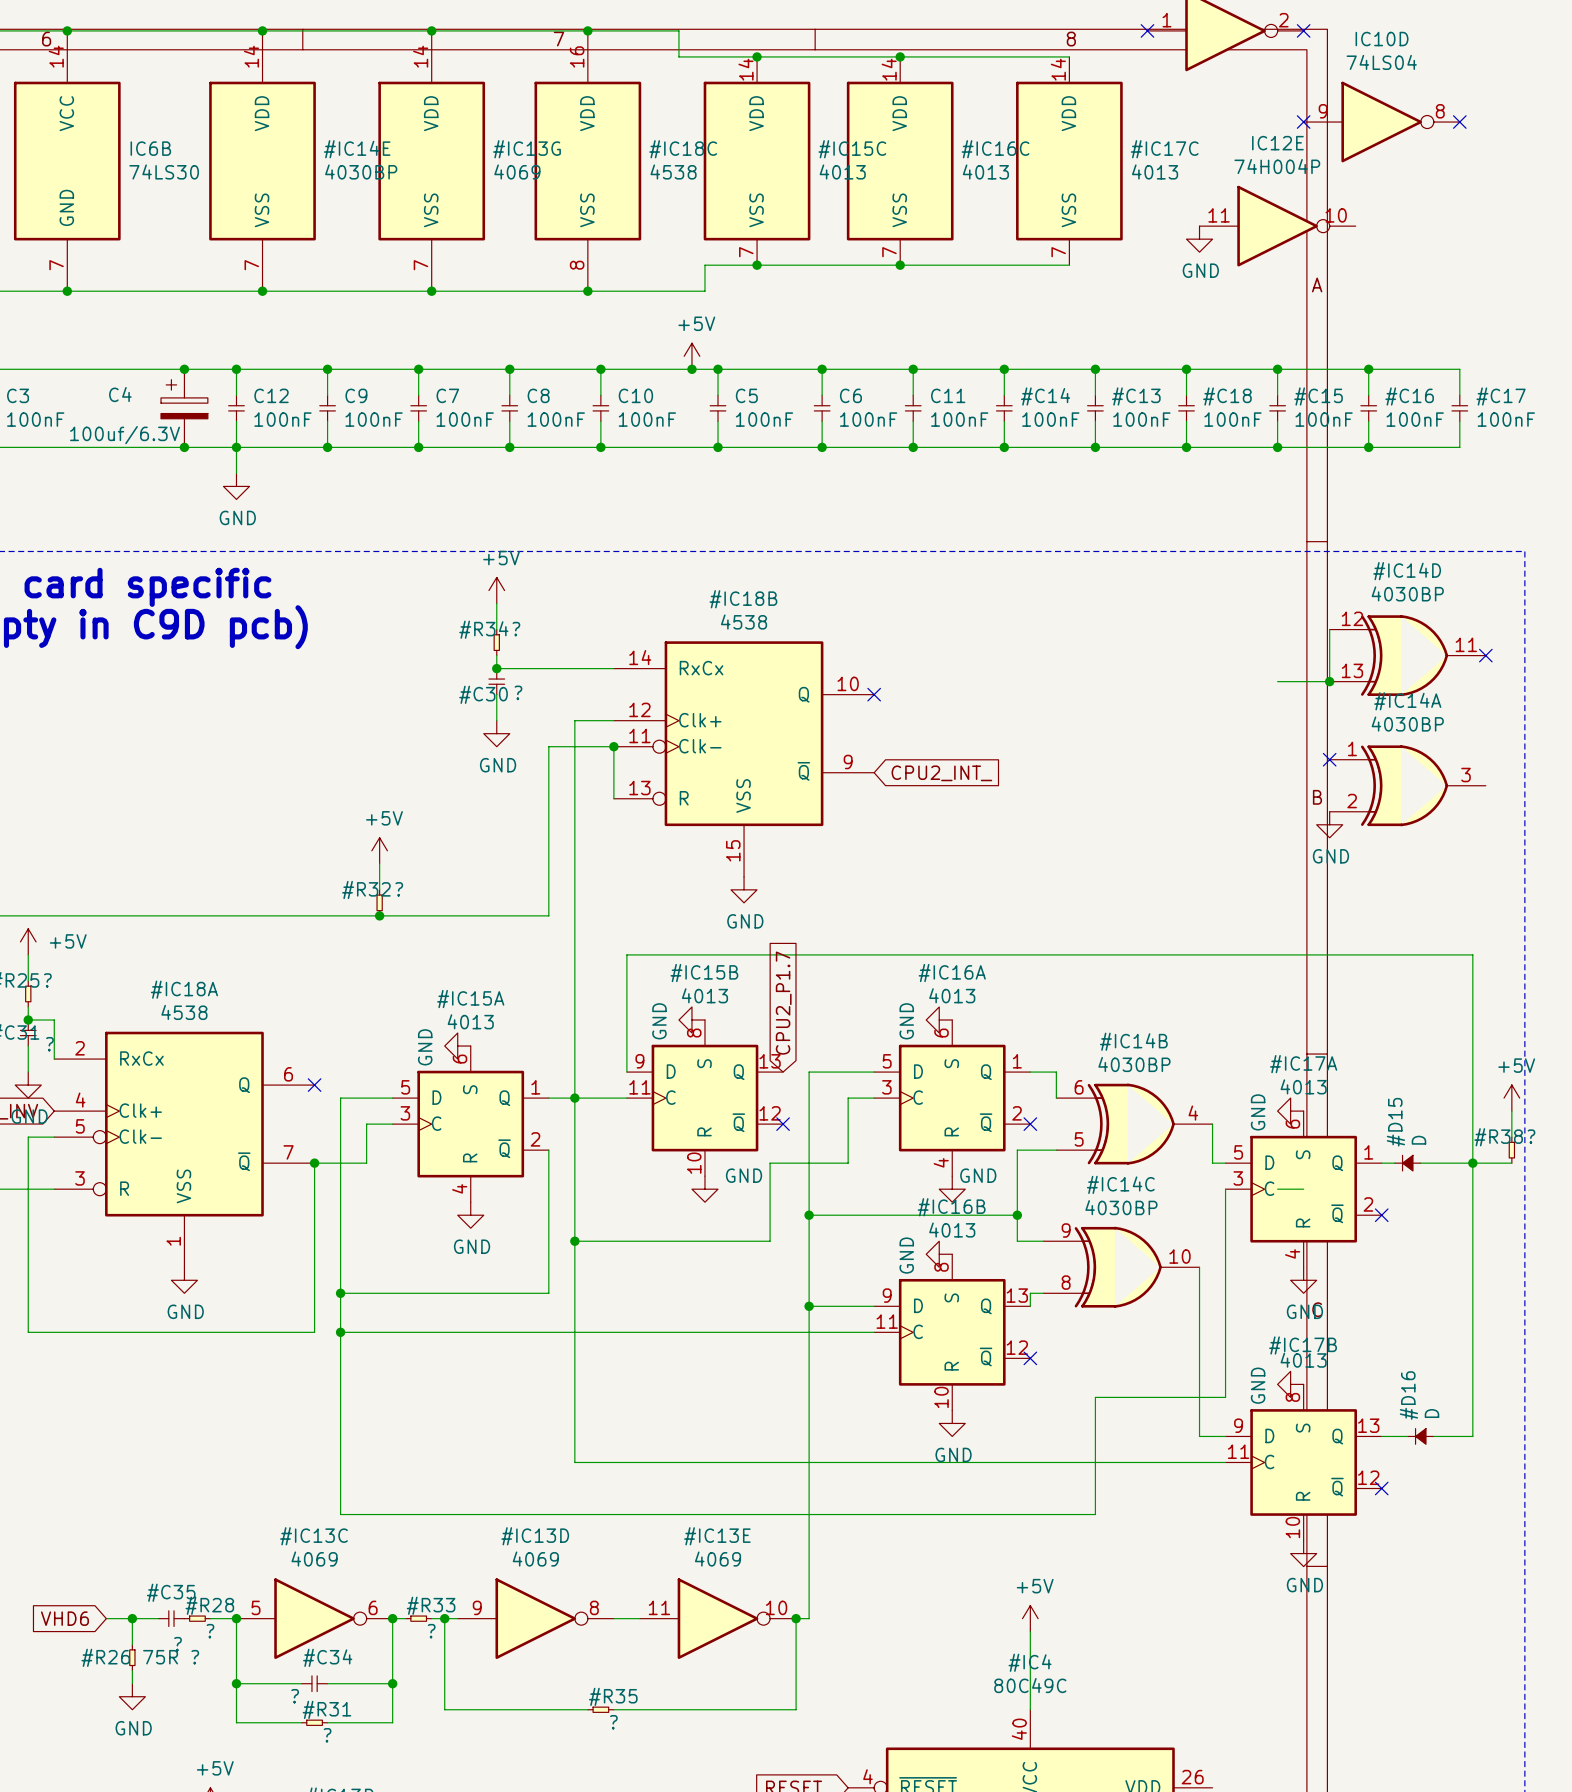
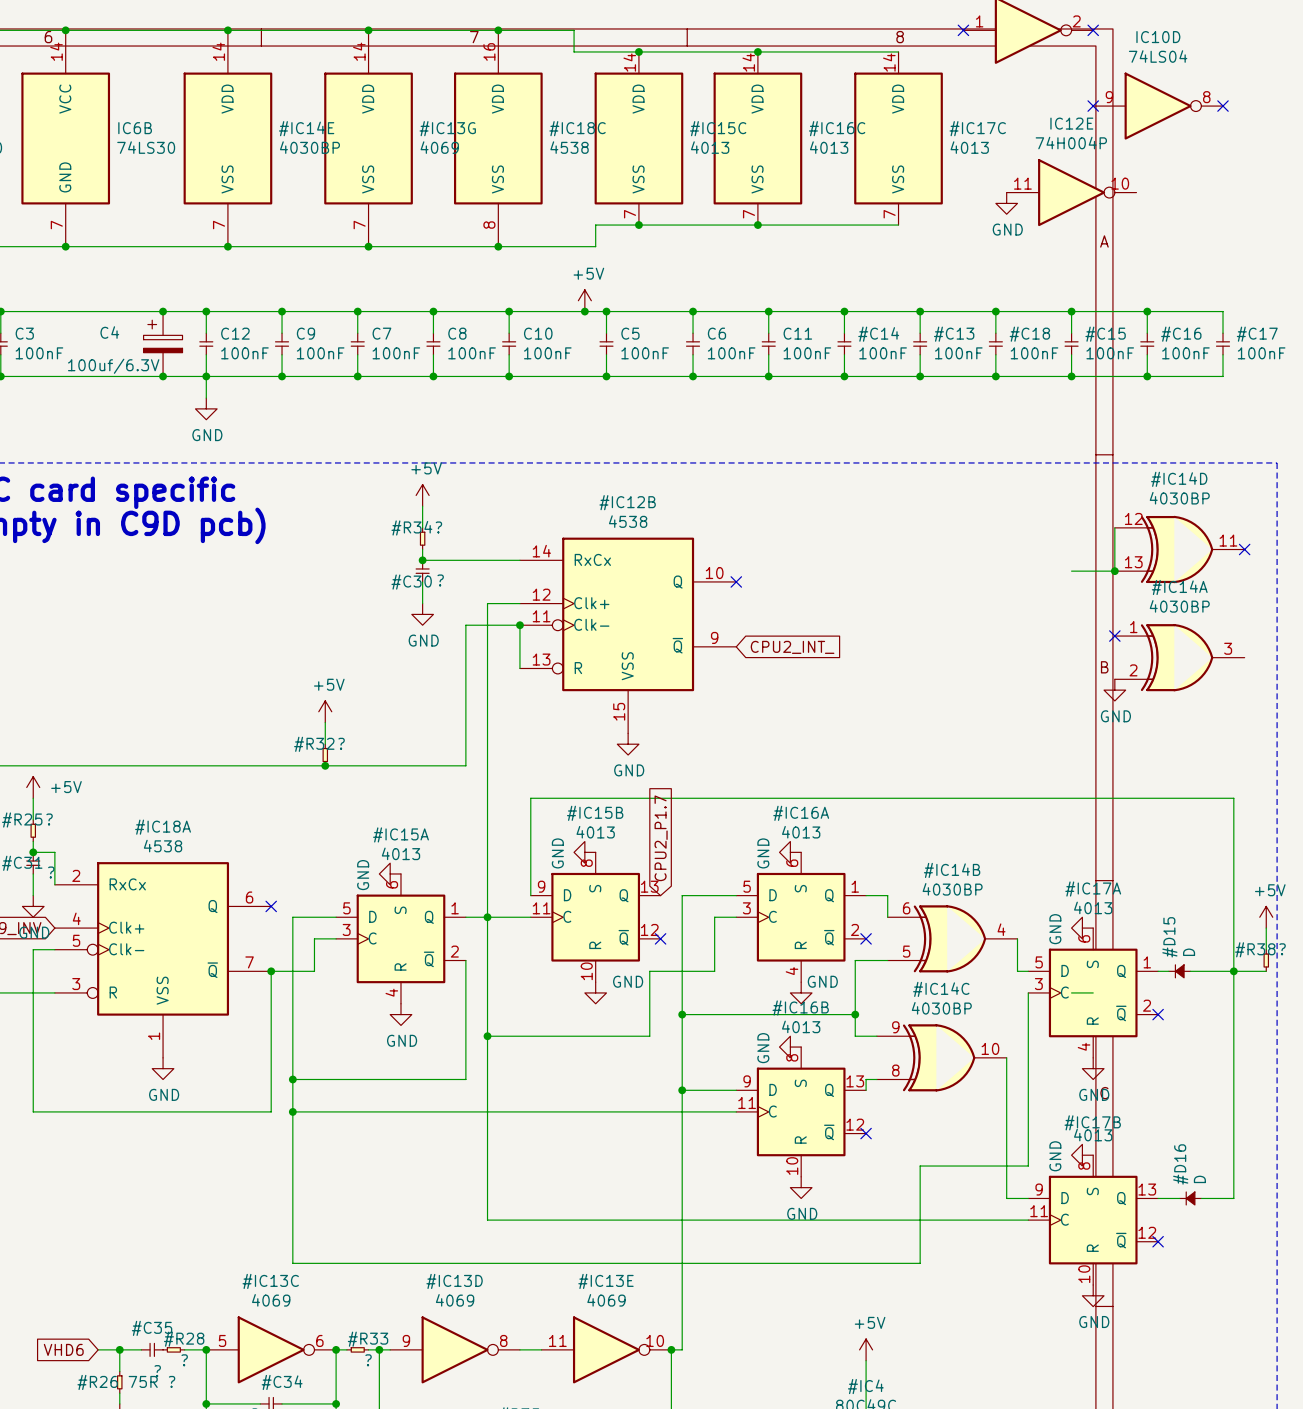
#IC18B name: #IC18B (743, 599) -> #IC12B (627, 502)

